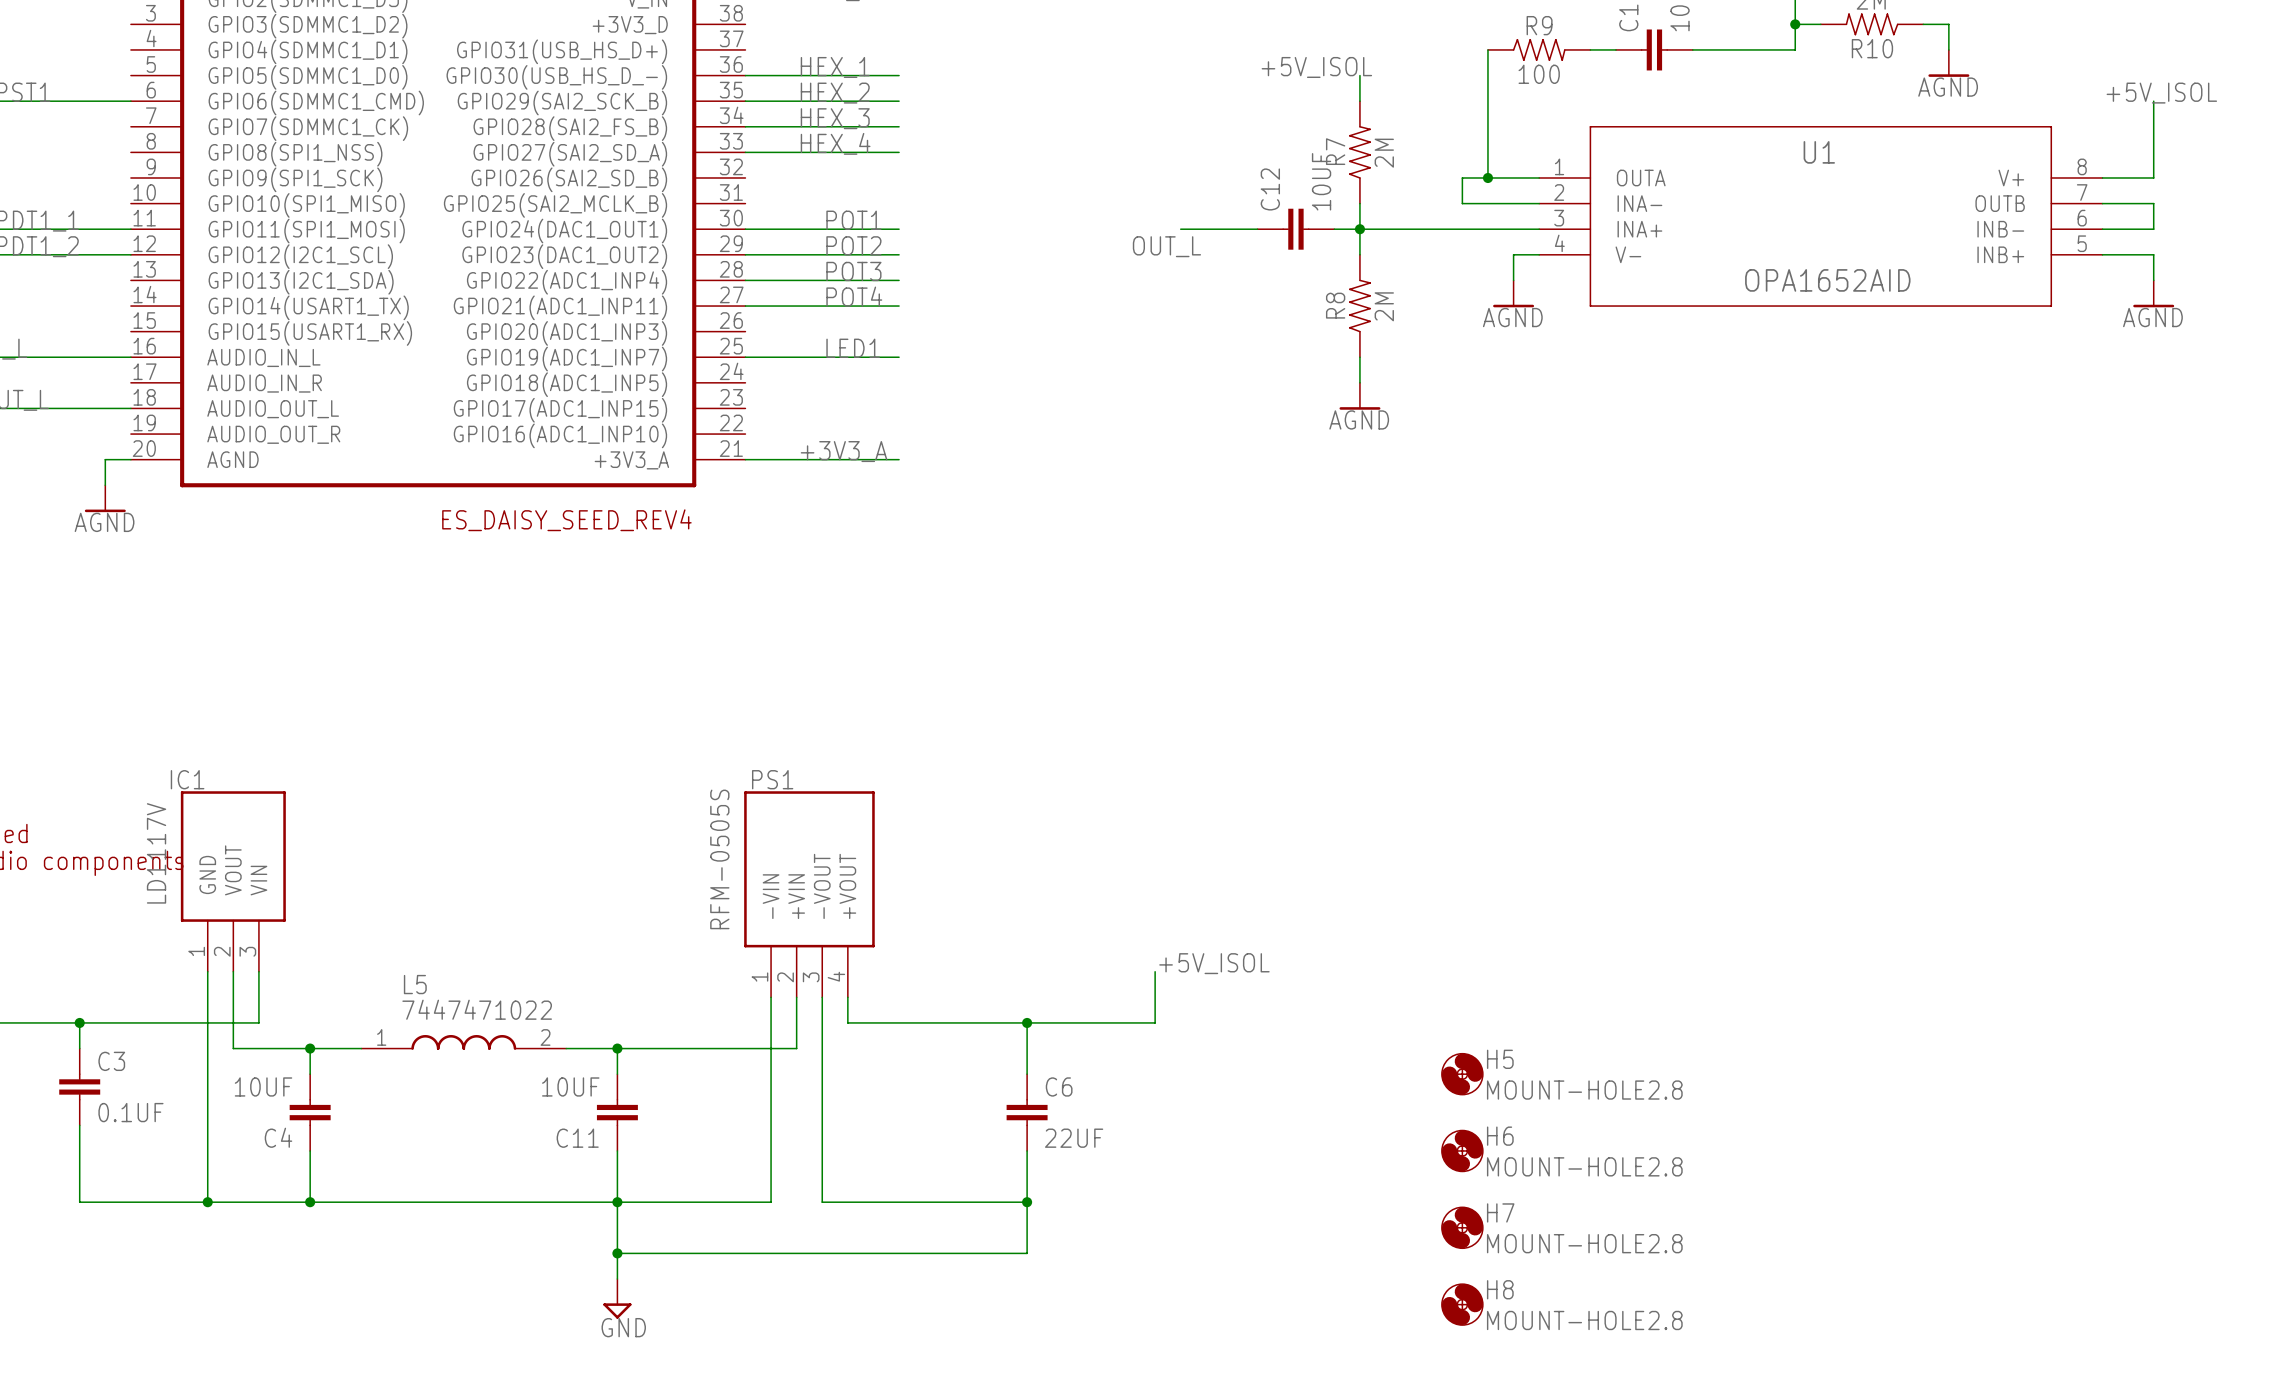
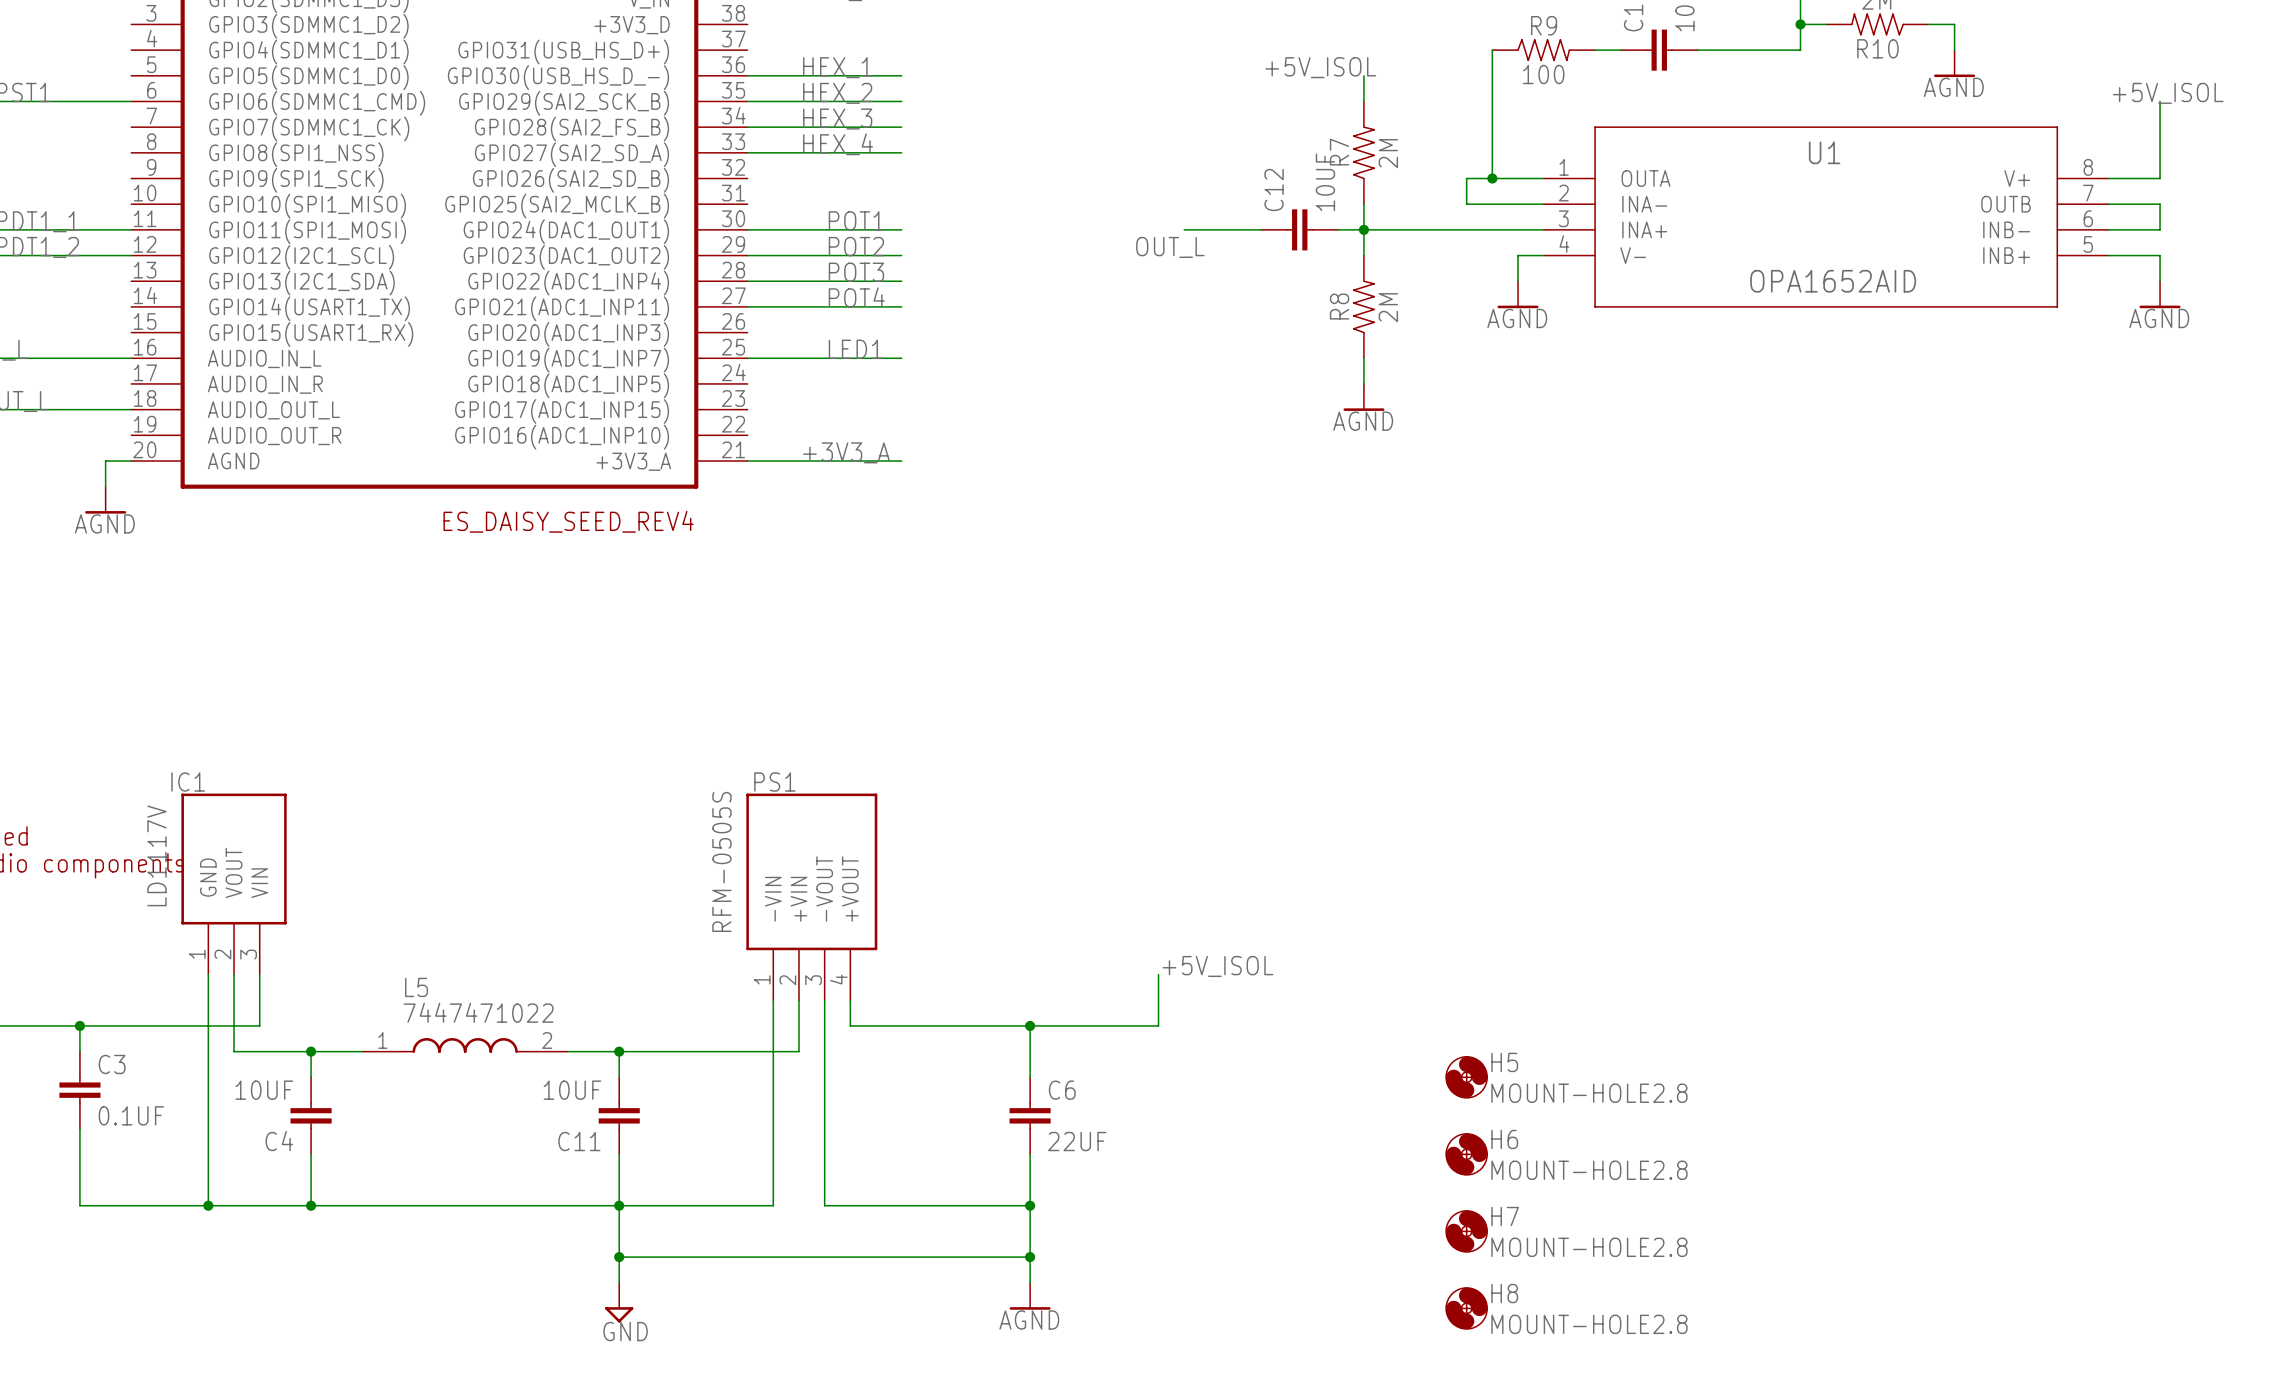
wire: none -> (1030, 1257) (1030, 1282)
junction: none -> (1030, 1257)
power symbol: none -> AGND (1030, 1296)

